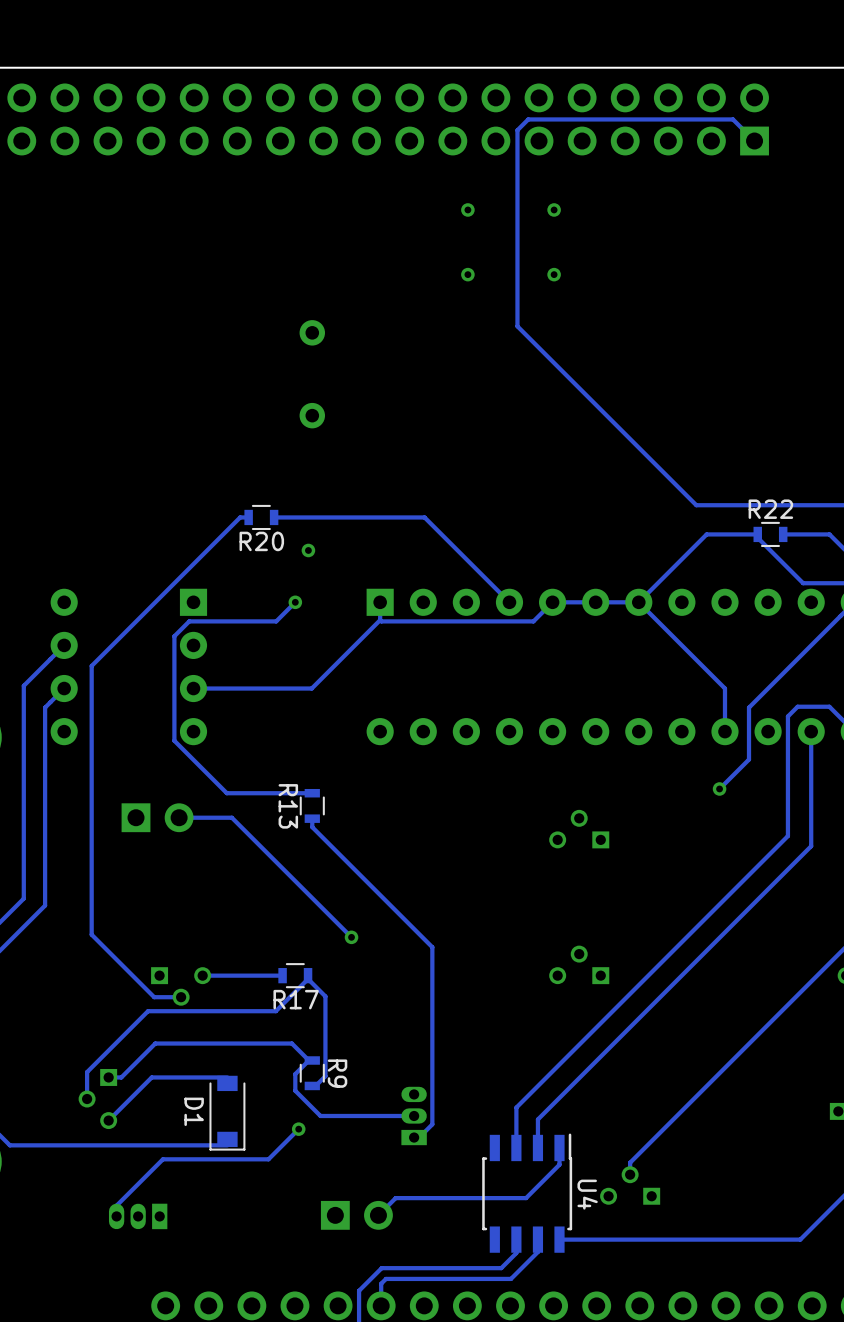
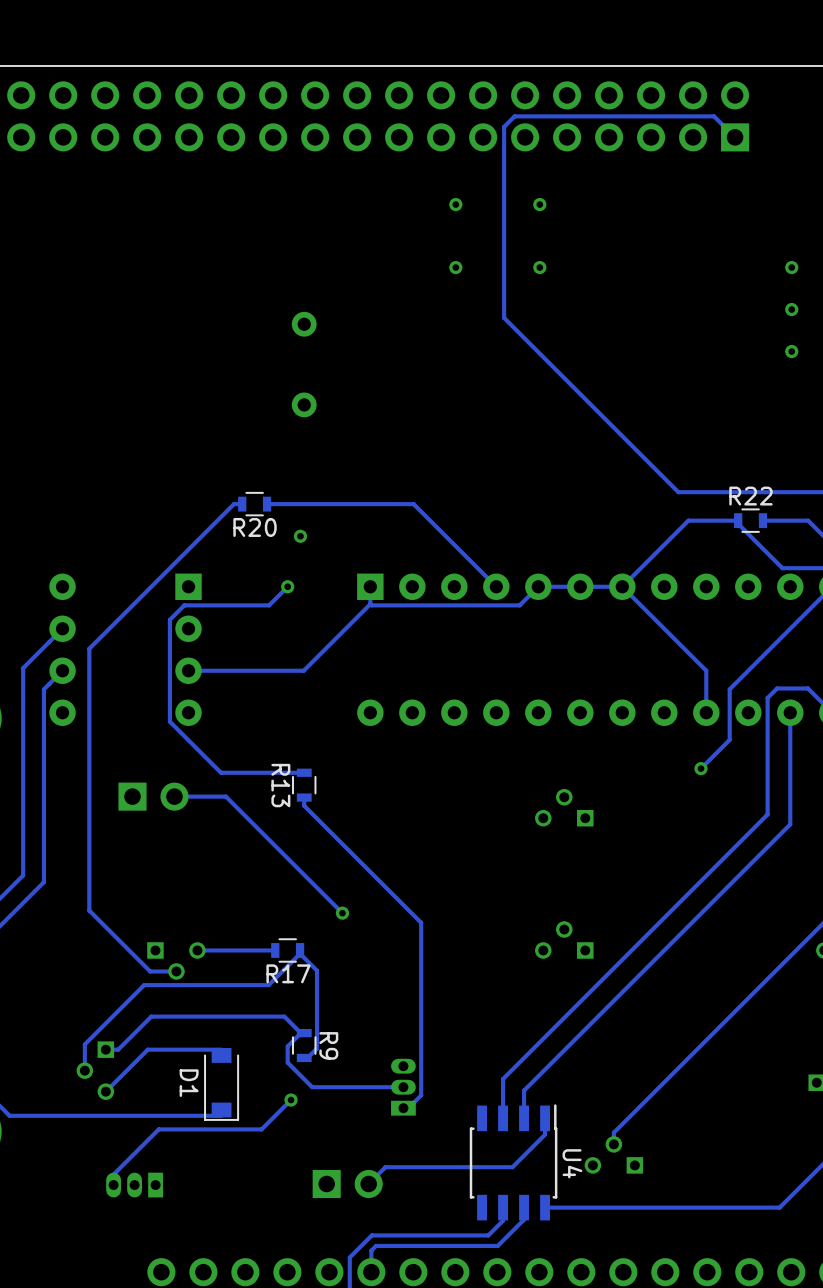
via: none -> (791, 267)
via: none -> (791, 309)
via: none -> (791, 351)

